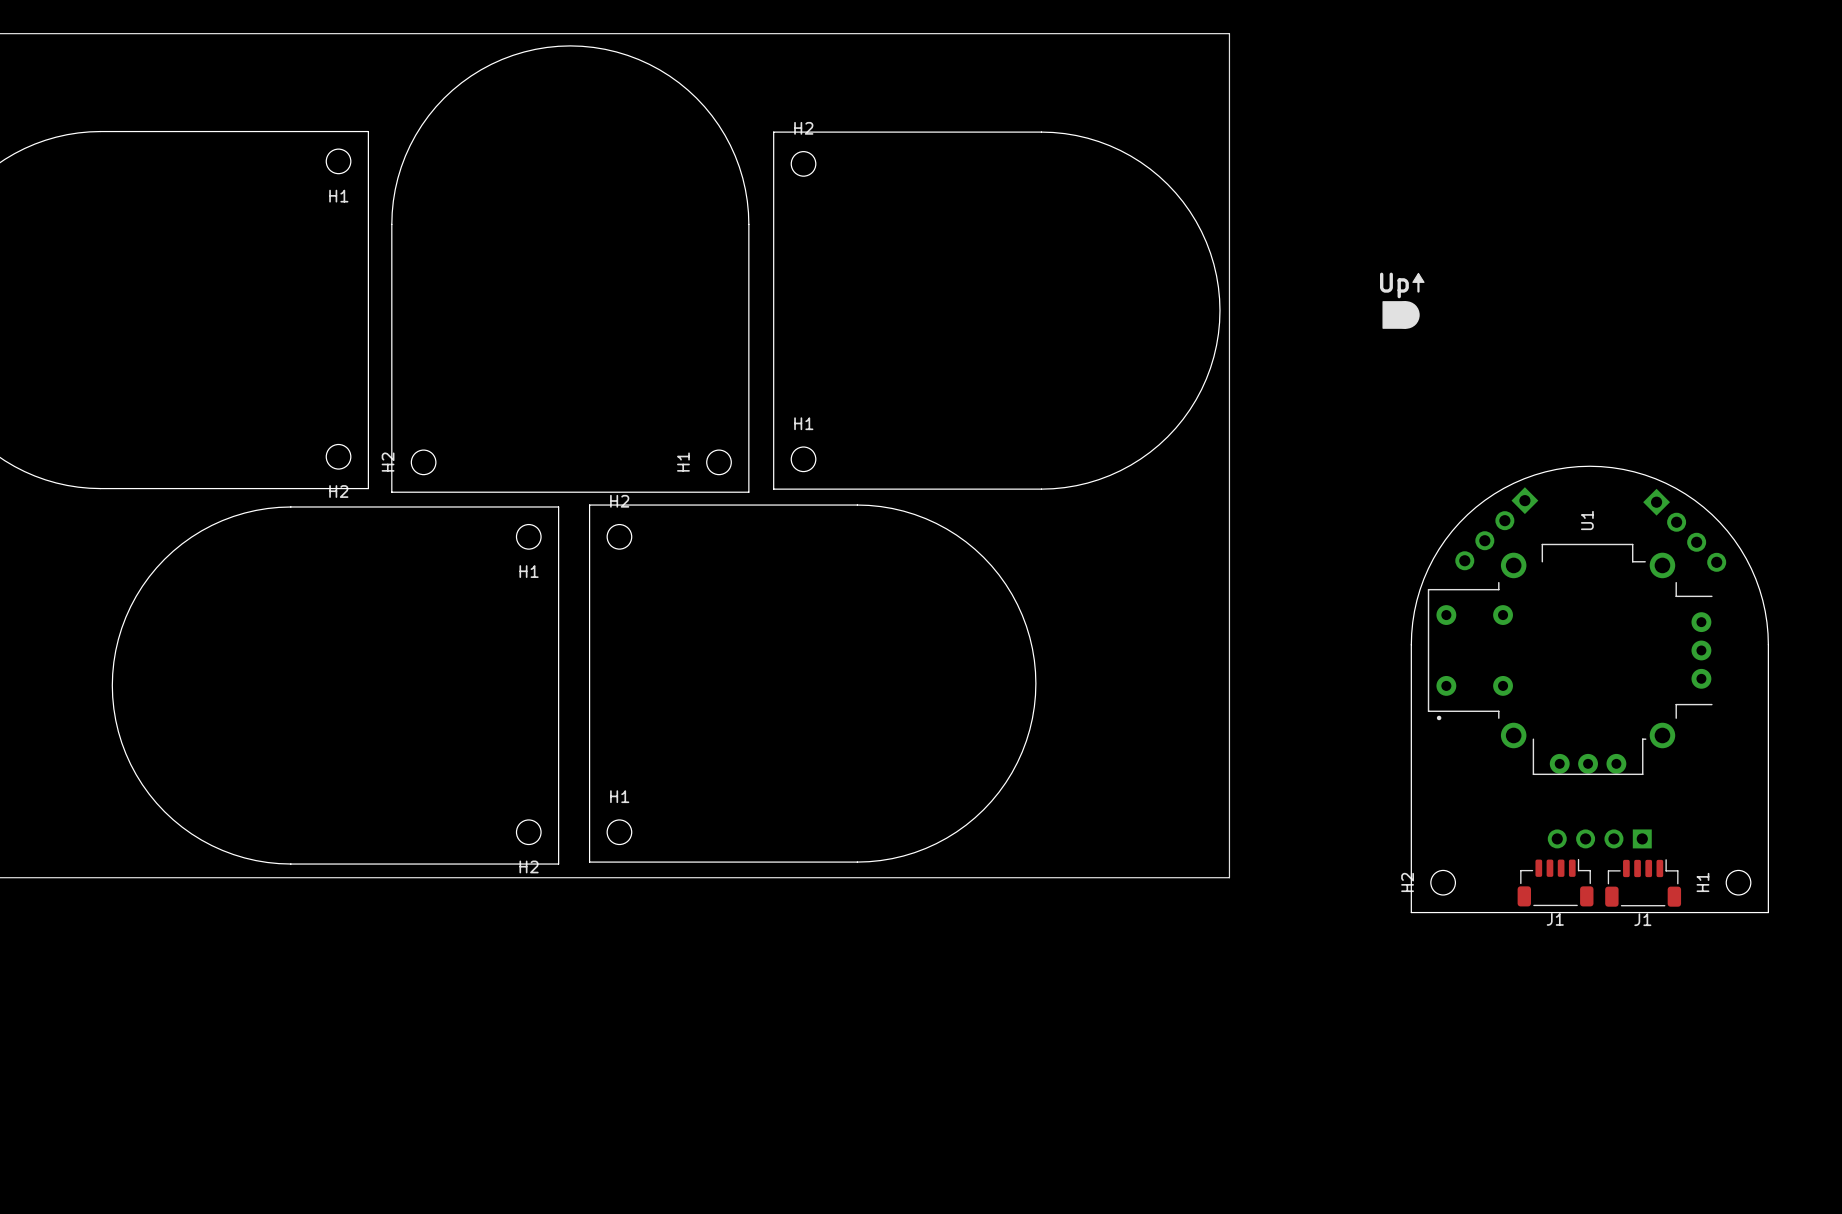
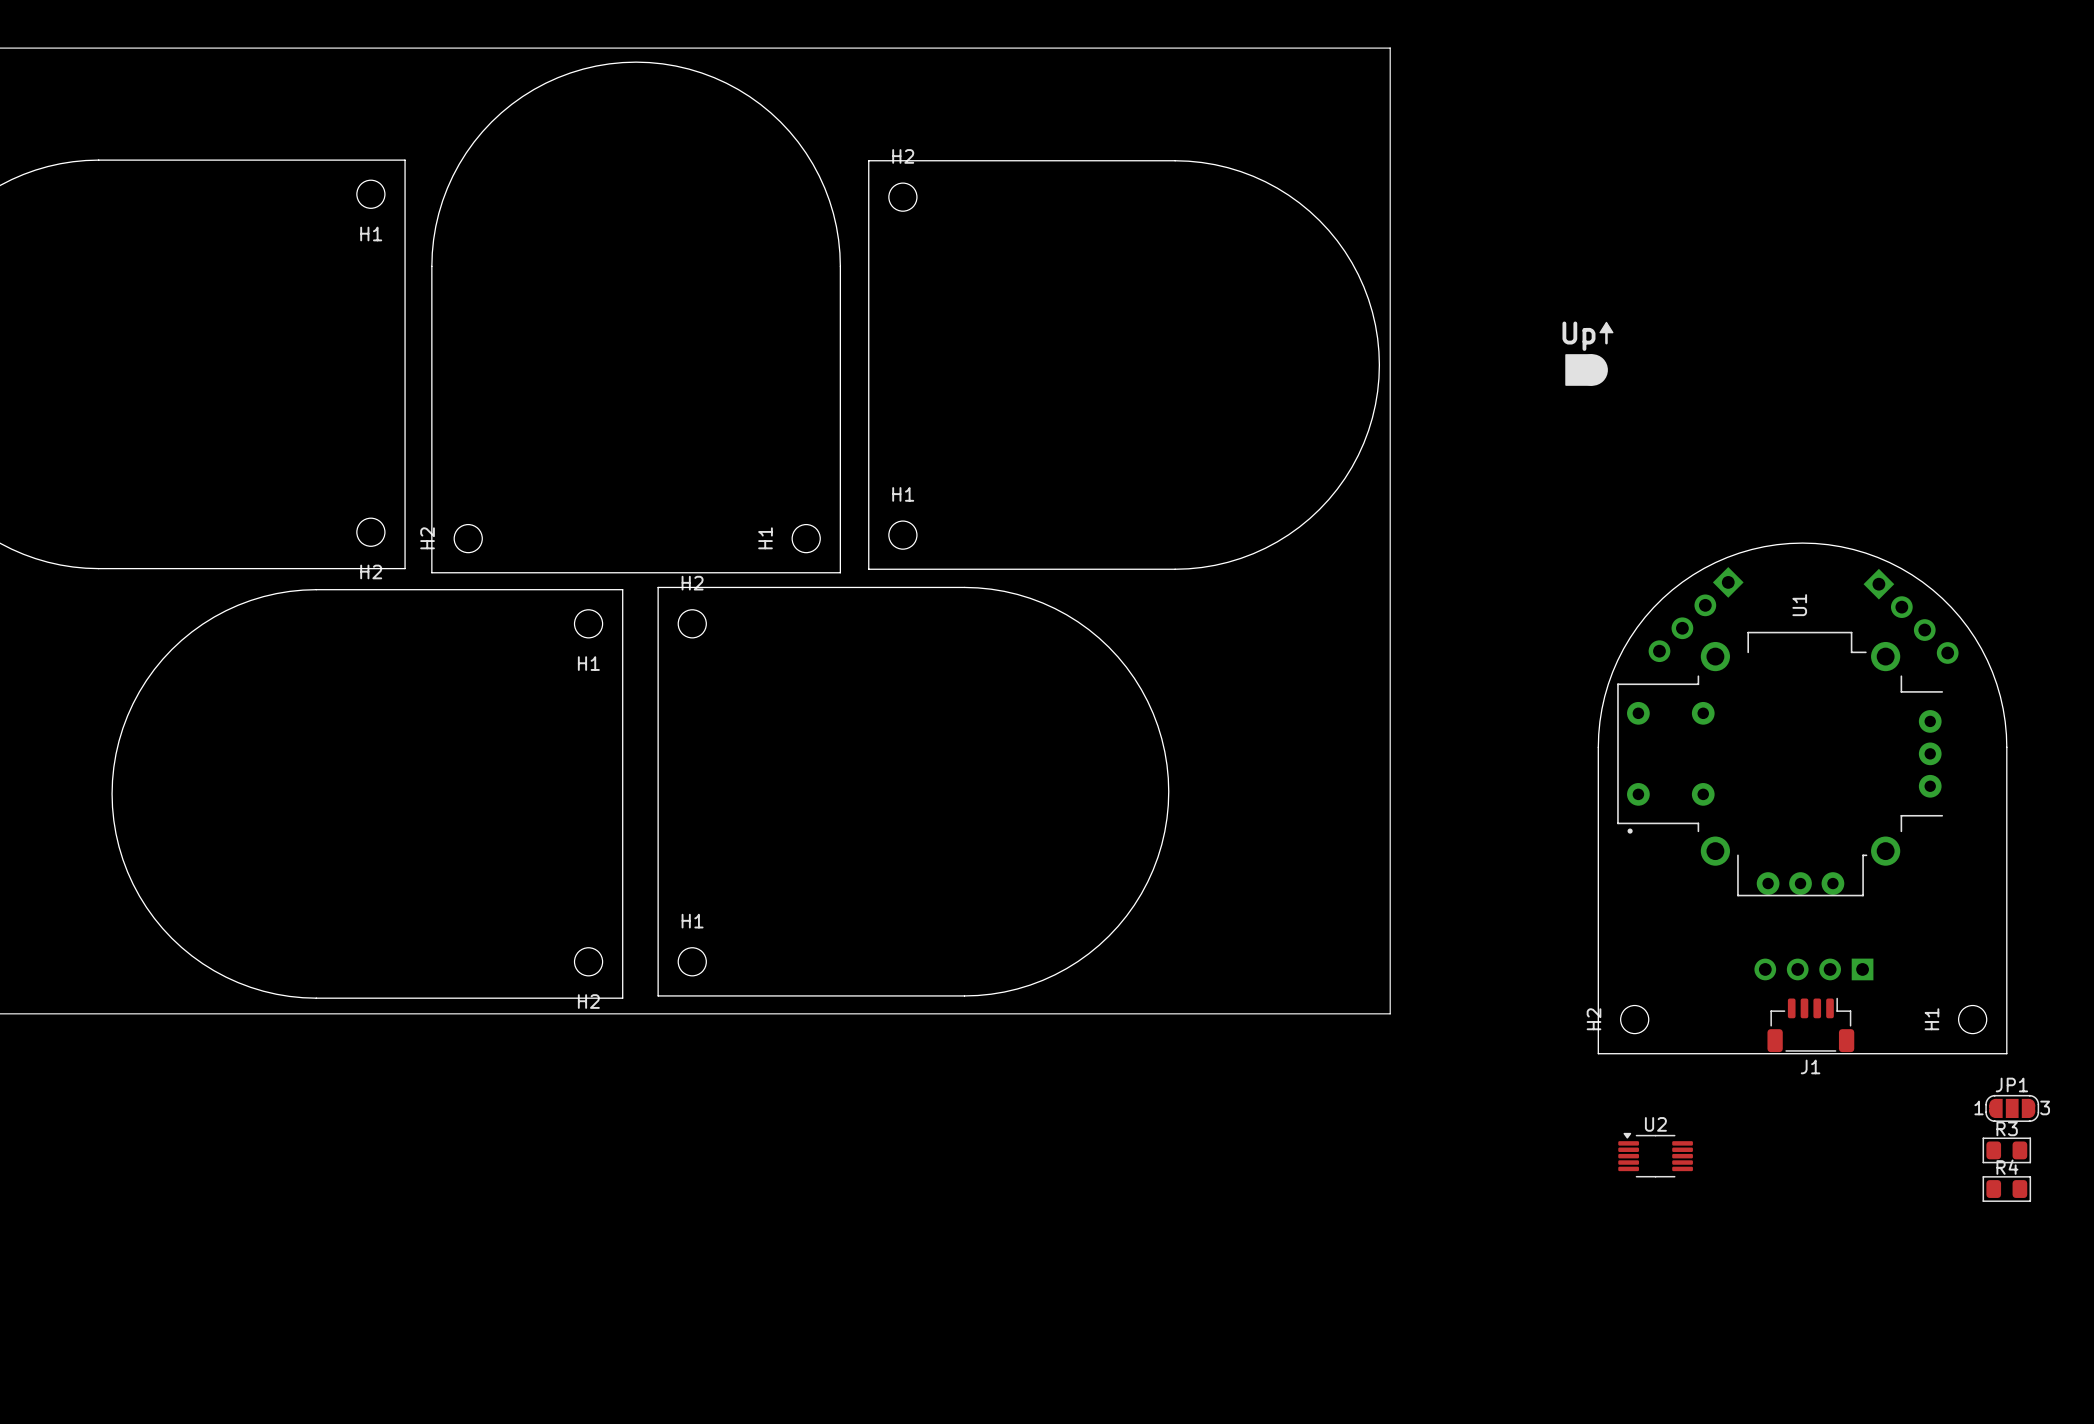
J1: (1555, 882) -> none
J1: (1643, 882) -> none
J1: none -> (1810, 1024)
JP1: none -> (2012, 1108)
R3: none -> (2006, 1150)
U2: none -> (1655, 1155)
R4: none -> (2006, 1189)

